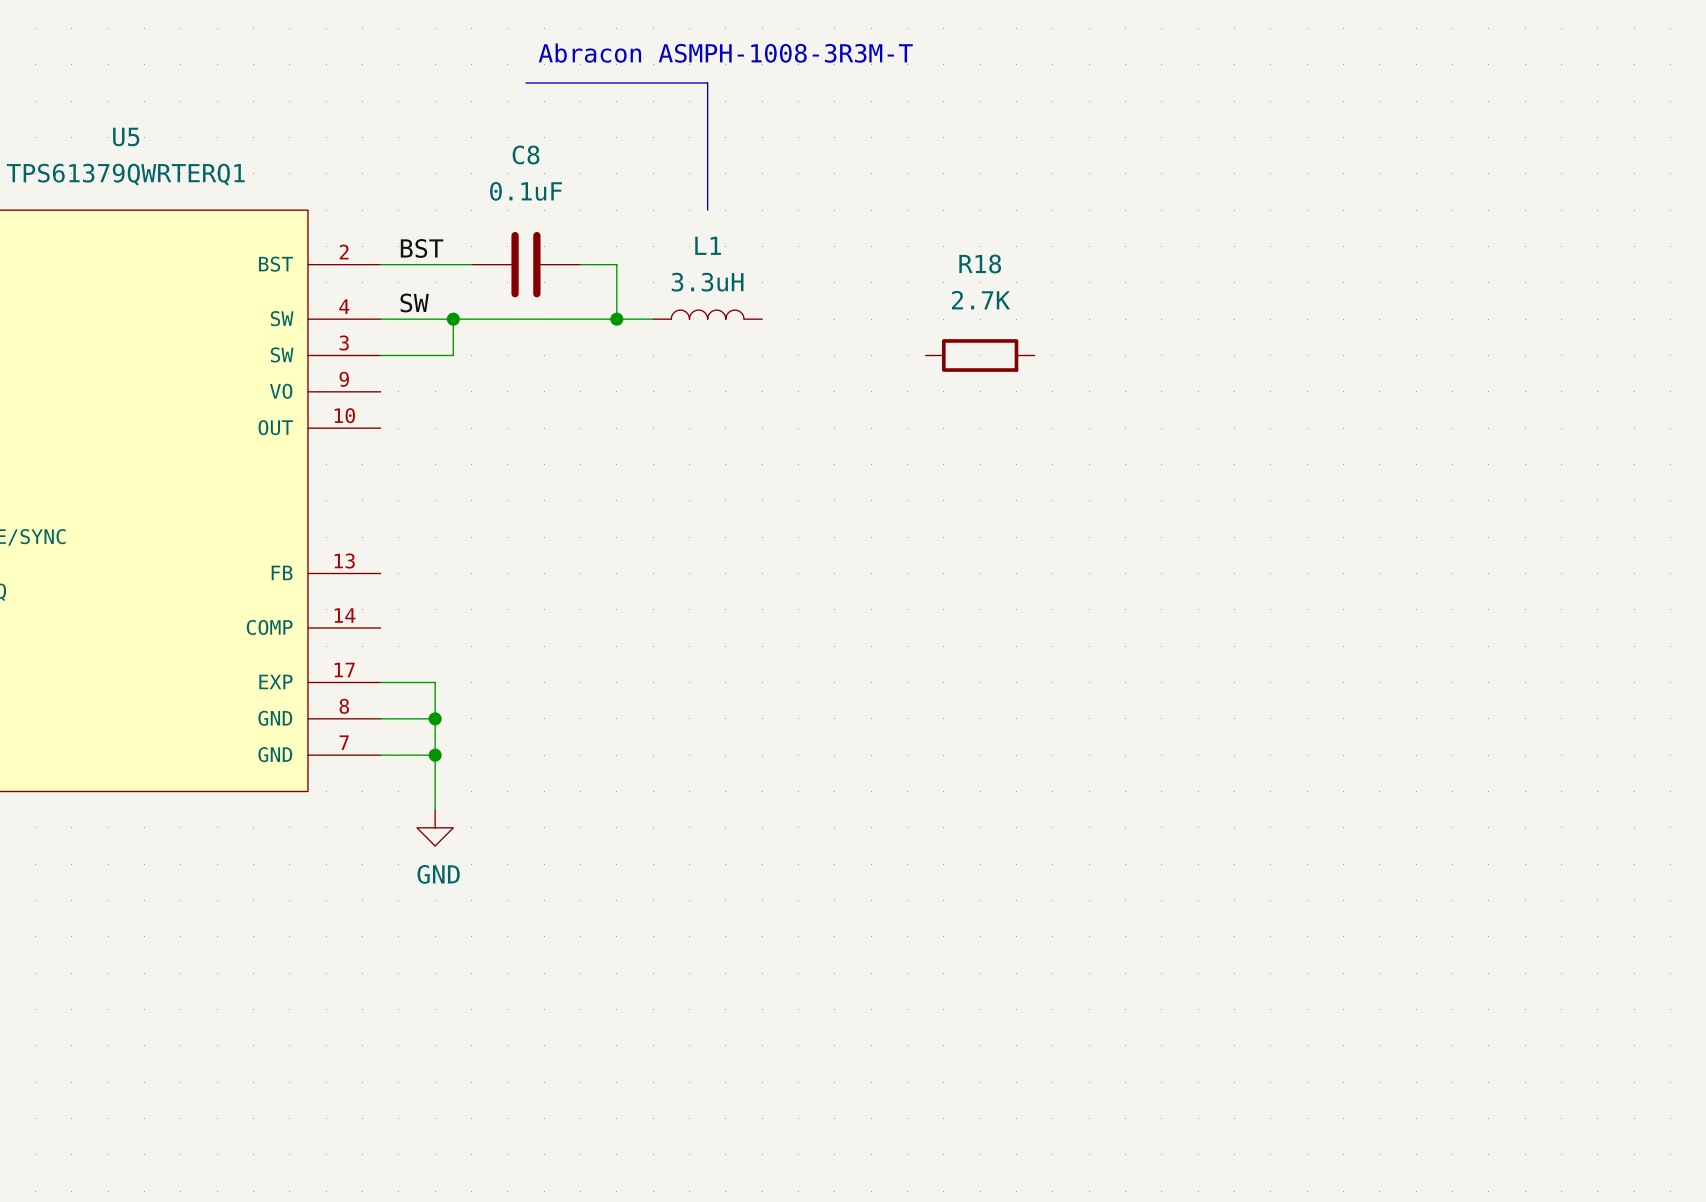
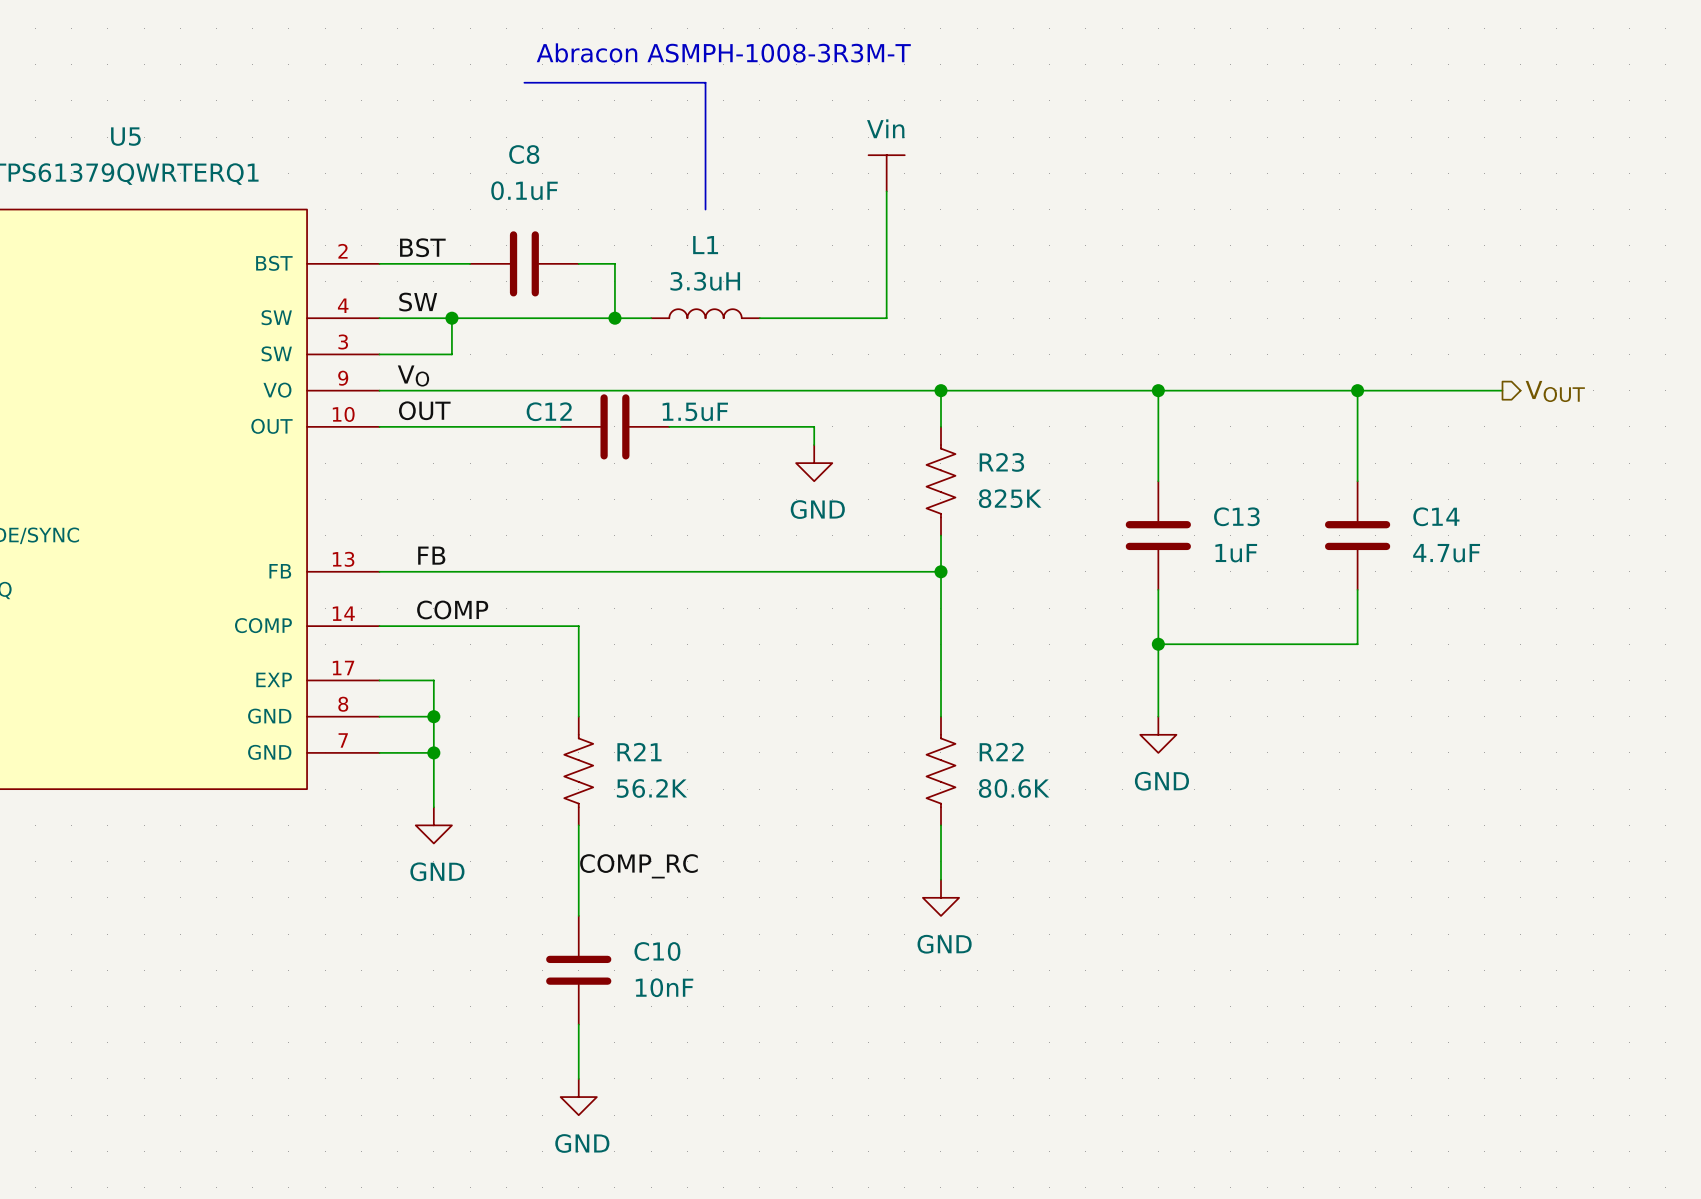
power symbol: none -> Vin (886, 173)
wire: none -> (886, 191) (886, 318) (759, 318)
R18: 2.7K (980, 355) -> none
label: none -> VO (413, 375)
wire: none -> (379, 390) (1502, 390)
wire: none -> (940, 390) (940, 426)
junction: none -> (940, 390)
wire: none -> (1158, 390) (1158, 481)
junction: none -> (1158, 390)
wire: none -> (1357, 390) (1357, 481)
junction: none -> (1357, 390)
hierarchical label: none -> VOUT (1555, 391)
label: none -> OUT (424, 410)
wire: none -> (379, 426) (560, 426)
C12: none -> 1.5uF (614, 426)
wire: none -> (669, 426) (814, 426) (814, 444)
power symbol: none -> GND (814, 463)
R23: none -> 825K (940, 481)
wire: none -> (940, 535) (940, 716)
C13: none -> 1uF (1158, 535)
C14: none -> 4.7uF (1357, 535)
label: none -> FB (431, 555)
wire: none -> (379, 571) (940, 571)
junction: none -> (940, 571)
wire: none -> (1158, 589) (1158, 716)
wire: none -> (1357, 589) (1357, 644) (1158, 644)
label: none -> COMP (452, 609)
wire: none -> (379, 626) (578, 626) (578, 716)
junction: none -> (1158, 644)
power symbol: none -> GND (1158, 734)
R21: none -> 56.2K (578, 771)
R22: none -> 80.6K (940, 771)
wire: none -> (578, 825) (578, 915)
wire: none -> (940, 825) (940, 879)
label: none -> COMP_RC (638, 866)
power symbol: none -> GND (940, 897)
C10: none -> 10nF (578, 970)
wire: none -> (578, 1024) (578, 1078)
power symbol: none -> GND (578, 1097)

